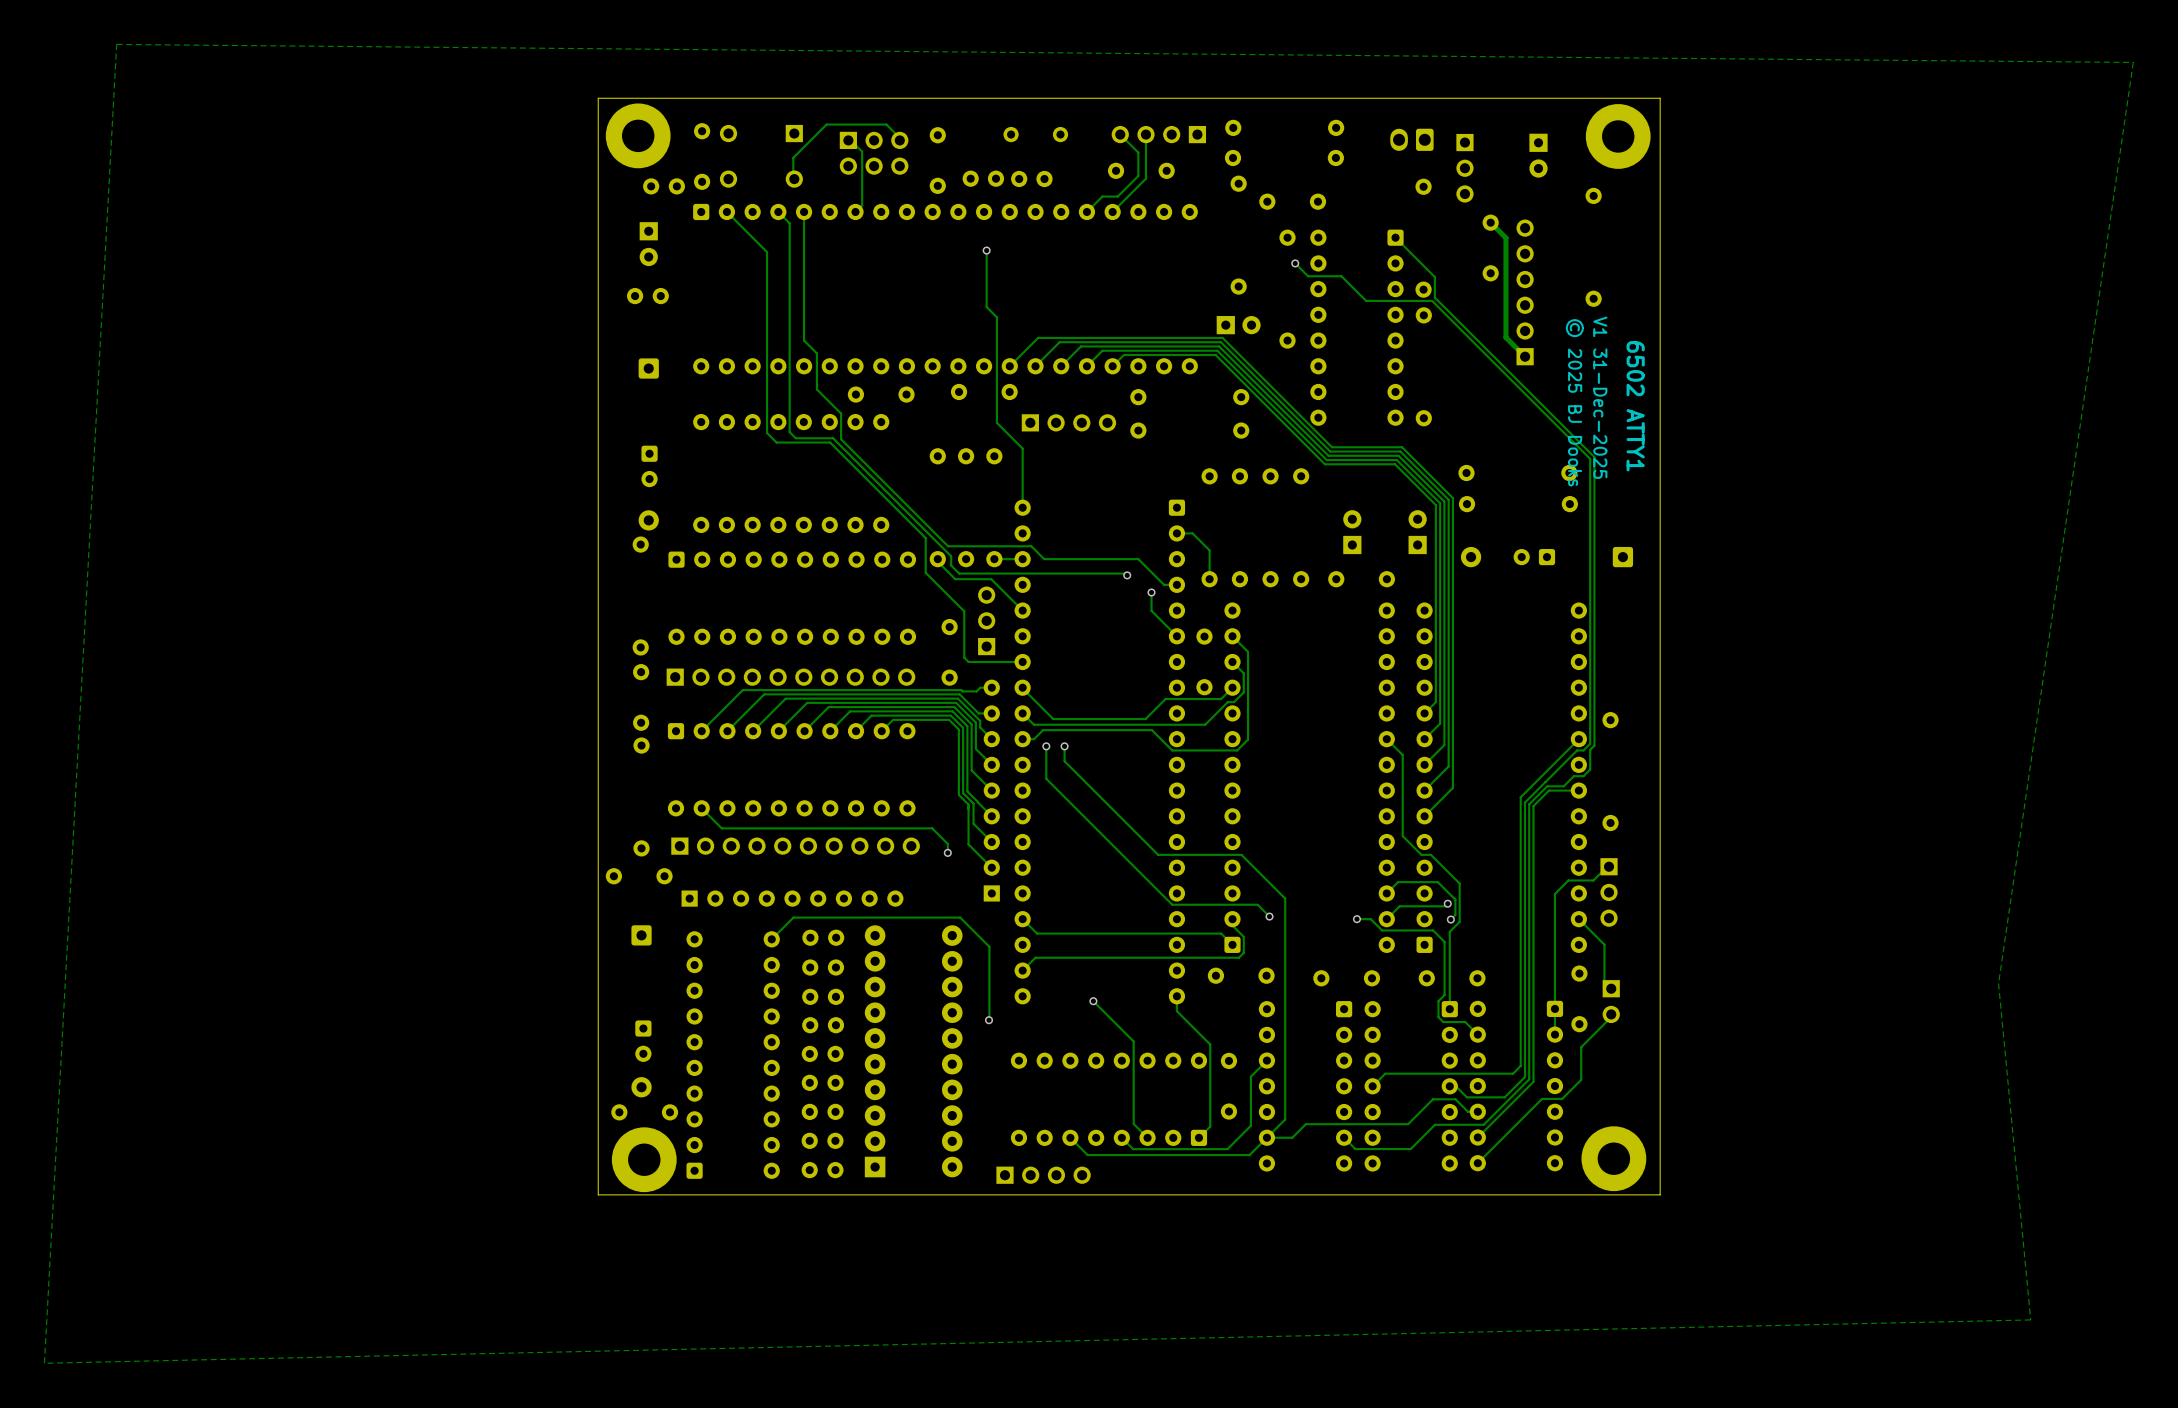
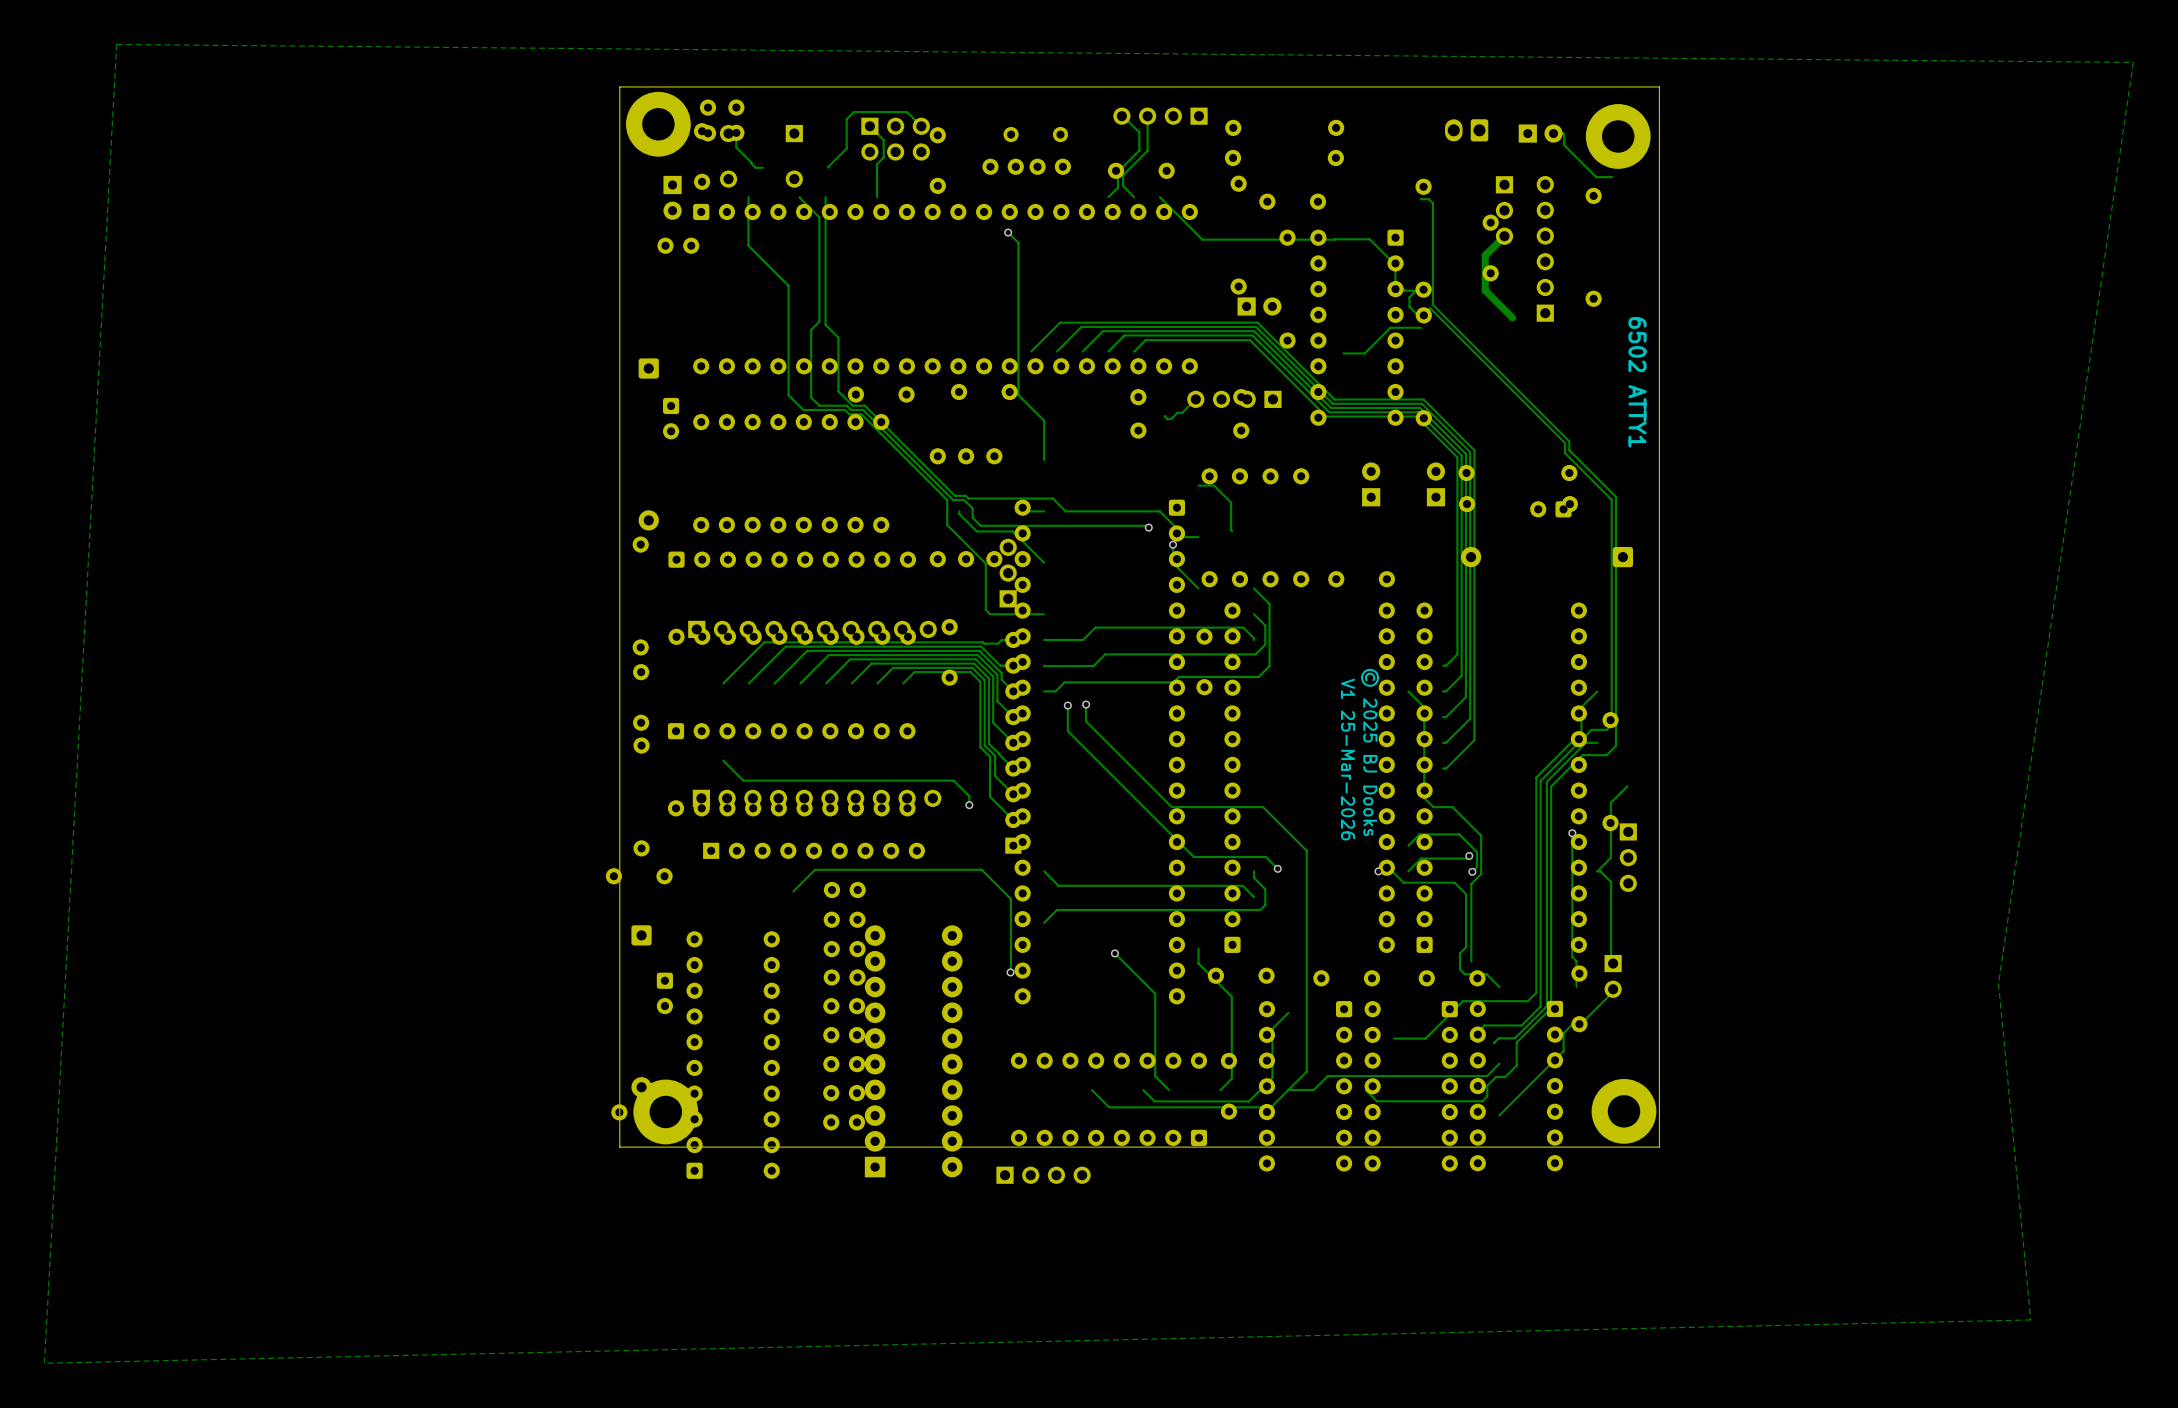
board edge: (1660, 98) (598, 98) (598, 1194) (1660, 1194) (1660, 98) -> (1659, 86) (1659, 1147) (619, 1147) (619, 86) (1659, 86)
track: none -> (1121, 116) (1139, 132) (1139, 150) (1118, 171) (1118, 187) (1108, 197)
track: none -> (1147, 116) (1147, 150) (1123, 175) (1123, 186) (1134, 197)
part: none -> (708, 120)
part: none -> (736, 120)
track: none -> (869, 126) (883, 140) (883, 157) (877, 164) (877, 197)
track: none -> (921, 126) (907, 112) (853, 112) (846, 119) (846, 148) (828, 167)
track: none -> (736, 132) (736, 147) (755, 167) (762, 167)
track: none -> (1553, 133) (1564, 134) (1564, 145) (1596, 177) (1612, 177)
track: (1120, 134) (1138, 152) (1138, 175) (1117, 196) (1102, 196) (1086, 211) -> none
track: (1145, 134) (1145, 178) (1112, 211) -> none
part position: (1158, 134) -> (1160, 116)
part position: (638, 135) -> (658, 124)
part position: (1411, 139) -> (1466, 130)
track: (848, 140) (850, 140) (862, 151) (862, 205) (855, 211) -> none
track: (899, 140) (899, 137) (886, 124) (826, 124) (793, 157) (794, 179) -> none
part position: (874, 153) -> (895, 139)
part rotation: 0° (1538, 155) -> 90° counterclockwise (1540, 133)
part: none -> (1003, 166)
part: none -> (1050, 166)
part position: (1464, 168) -> (1504, 210)
part: (983, 178) -> none
part: (1031, 179) -> none
part: (664, 186) -> none
track: none -> (748, 197) (748, 245) (788, 285) (788, 395) (803, 409) (845, 409) (849, 414) (861, 414) (947, 500) (947, 525) (985, 563) (985, 609) (990, 614) (1044, 614)
track: none -> (799, 197) (819, 217) (819, 321) (811, 329) (811, 397) (819, 405) (846, 405) (851, 409) (863, 409) (953, 500) (964, 500) (966, 502) (972, 508) (972, 517) (980, 525) (1146, 525) (1148, 527) (1146, 527)
track: none -> (825, 197) (825, 324) (838, 337) (838, 391) (852, 405) (864, 405) (955, 495) (965, 495) (968, 498) (1052, 498) (1065, 511) (1159, 511) (1185, 537) (1198, 537)
track: none -> (1159, 197) (1202, 239) (1369, 239) (1395, 264) (1395, 281) (1405, 290) (1416, 290) (1409, 297) (1409, 306) (1416, 313) (1425, 313) (1430, 308) (1565, 443) (1565, 453) (1611, 499) (1611, 724) (1606, 729) (1591, 729) (1540, 780) (1540, 1006) (1521, 1025) (1484, 1025) (1471, 1038)
track: none -> (1420, 199) (1428, 199) (1432, 203) (1432, 304) (1569, 441) (1569, 450) (1615, 496) (1615, 746) (1606, 755) (1582, 755) (1551, 786) (1551, 1008) (1516, 1042) (1516, 1065) (1505, 1077) (1496, 1077) (1487, 1085) (1487, 1096) (1482, 1101) (1376, 1101) (1365, 1089)
track: (726, 211) (767, 252) (767, 432) (776, 442) (830, 442) (925, 538) (925, 572) (964, 611) (964, 657) (968, 662) (1022, 662) -> none
track: (778, 211) (789, 223) (789, 432) (795, 438) (833, 438) (951, 556) (951, 565) (959, 573) (1125, 573) (1127, 575) (1124, 575) -> none
track: (804, 211) (804, 340) (816, 353) (816, 389) (841, 413) (841, 439) (948, 546) (1031, 546) (1044, 559) (1138, 559) (1164, 584) (1176, 584) -> none
track: (1490, 222) (1505, 237) (1505, 337) (1525, 356) -> none
track: none -> (1008, 232) (1018, 242) (1018, 395) (1044, 420) (1044, 459)
track: none -> (1504, 236) (1485, 255) (1485, 290) (1512, 317)
track: (1395, 237) (1434, 277) (1434, 297) (1594, 457) (1594, 745) (1590, 749) (1590, 769) (1583, 776) (1573, 776) (1563, 786) (1547, 786) (1529, 804) (1529, 1079) (1483, 1124) (1434, 1124) (1410, 1149) (1355, 1149) (1344, 1137) -> none
part position: (648, 244) -> (672, 197)
part: none -> (678, 245)
track: (986, 250) (986, 307) (996, 317) (996, 422) (1022, 448) (1022, 507) -> none
via position: (986, 250) -> (1008, 232)
track: (1295, 263) (1308, 276) (1341, 276) (1366, 300) (1432, 300) (1590, 458) (1590, 743) (1583, 750) (1577, 750) (1524, 802) (1524, 1077) (1504, 1097) (1466, 1097) (1455, 1086) (1449, 1086) -> none
via: (1295, 263) -> none
part position: (1525, 292) -> (1545, 248)
part: (647, 296) -> none
part position: (1238, 325) -> (1259, 306)
track: none -> (1420, 327) (1390, 327) (1364, 353) (1343, 353)
track: none -> (1031, 351) (1060, 322) (1257, 322) (1334, 399) (1423, 399) (1474, 450) (1474, 740) (1446, 768) (1443, 768)
track: none -> (1057, 351) (1081, 326) (1256, 326) (1332, 403) (1421, 403) (1470, 452) (1470, 718) (1446, 742) (1443, 742)
track: none -> (1082, 351) (1103, 331) (1254, 331) (1331, 408) (1420, 408) (1465, 453) (1465, 697) (1446, 717) (1443, 717)
track: none -> (1108, 351) (1124, 335) (1252, 335) (1329, 412) (1418, 412) (1461, 455) (1461, 675) (1446, 691) (1443, 691)
track: none -> (1134, 351) (1145, 340) (1249, 340) (1326, 416) (1416, 416) (1457, 457) (1457, 654) (1446, 665) (1443, 665)
track: (1009, 366) (1038, 337) (1222, 337) (1331, 447) (1402, 447) (1452, 498) (1452, 787) (1424, 816) -> none
track: (1035, 366) (1059, 342) (1220, 342) (1330, 451) (1400, 451) (1448, 499) (1448, 766) (1424, 790) -> none
track: (1061, 366) (1081, 346) (1219, 346) (1328, 455) (1398, 455) (1444, 501) (1444, 745) (1424, 764) -> none
track: (1086, 366) (1102, 350) (1217, 350) (1326, 460) (1396, 460) (1440, 503) (1440, 723) (1424, 739) -> none
track: (1112, 366) (1123, 354) (1215, 355) (1324, 464) (1395, 464) (1435, 505) (1435, 702) (1424, 713) -> none
text: V1 31-Dec-2025 (1600, 397) -> none
track: none -> (1195, 399) (1182, 412) (1177, 412) (1171, 418) (1167, 418) (1165, 415)
part: none -> (1234, 399)
text: © 2025 BJ Dooks (1574, 402) -> none
text position: 6502 ATTY1 (1635, 406) -> 6502 ATTY1 (1637, 382)
part: (1068, 422) -> none
part position: (649, 466) -> (671, 418)
part: none -> (1371, 484)
part: none -> (1435, 484)
via: none -> (1148, 527)
part: (1352, 532) -> none
part: (1417, 532) -> none
track: (1176, 533) (1192, 533) (1209, 550) (1210, 578) -> (1198, 485) (1214, 485) (1231, 502) (1232, 531)
via: none -> (1173, 544)
part position: (1534, 557) -> (1550, 509)
track: (937, 559) (937, 561) (955, 579) (991, 579) (1022, 610) -> (959, 511) (959, 513) (976, 531) (1012, 531) (1044, 562)
track: (1022, 559) (994, 559) -> (1044, 511) (1015, 511)
via: (1127, 575) -> none
track: none -> (1254, 588) (1269, 604) (1269, 666) (1258, 676) (1178, 676) (1173, 682) (1064, 682) (1055, 691) (1044, 691)
track: (1151, 592) (1151, 610) (1176, 636) -> (1173, 544) (1173, 563) (1198, 588)
via: (1151, 592) -> none
track: none -> (1254, 614) (1265, 625) (1265, 644) (1255, 654) (1105, 654) (1093, 666) (1044, 665)
part position: (986, 620) -> (1008, 573)
track: (1232, 636) (1248, 651) (1248, 739) (1237, 750) (1172, 750) (1151, 730) (1043, 730) (1034, 739) (1022, 739) -> none
track: none -> (1254, 639) (1243, 627) (1095, 627) (1083, 639) (1044, 639)
track: (1232, 662) (1243, 673) (1243, 692) (1234, 702) (1227, 702) (1205, 724) (1033, 724) (1022, 713) -> none
part position: (790, 677) -> (812, 629)
track: (991, 687) (980, 687) (976, 691) (742, 690) (701, 731) -> (1013, 639) (1001, 639) (998, 643) (764, 642) (723, 683)
track: (1232, 687) (1221, 699) (1165, 699) (1145, 719) (1053, 719) (1022, 687) -> none
track: none -> (1408, 691) (1424, 707) (1424, 797) (1433, 807) (1452, 807) (1481, 835) (1481, 874) (1471, 884) (1471, 961)
track: none -> (1597, 691) (1581, 707) (1581, 732) (1536, 777) (1536, 992) (1527, 1001) (1463, 1001) (1425, 1038) (1394, 1038)
track: none -> (1086, 704) (1086, 721) (1171, 807) (1263, 807) (1306, 850) (1306, 1071) (1271, 1107) (1109, 1107) (1091, 1090)
via: none -> (1086, 704)
track: none -> (1067, 705) (1067, 731) (1193, 856) (1265, 856) (1277, 868)
via: none -> (1067, 705)
track: (991, 713) (978, 713) (959, 694) (764, 694) (727, 731) -> (1013, 665) (1000, 665) (981, 646) (785, 646) (748, 683)
track: (753, 731) (785, 698) (957, 698) (980, 720) (980, 727) (991, 739) -> (774, 683) (807, 650) (979, 650) (1001, 673) (1001, 679) (1013, 691)
track: (778, 731) (807, 702) (956, 702) (975, 722) (975, 748) (991, 764) -> (800, 683) (828, 655) (977, 655) (997, 674) (997, 701) (1013, 717)
track: (804, 731) (828, 707) (954, 707) (971, 724) (971, 770) (991, 790) -> (826, 683) (850, 659) (975, 659) (993, 676) (993, 722) (1013, 742)
track: (830, 731) (850, 711) (952, 711) (967, 726) (967, 791) (991, 816) -> (851, 683) (871, 663) (974, 663) (988, 678) (988, 743) (1013, 768)
track: (856, 731) (871, 715) (950, 715) (963, 727) (963, 793) (973, 803) (973, 823) (991, 842) -> (877, 683) (893, 667) (972, 667) (984, 680) (984, 745) (995, 755) (995, 775) (1013, 794)
track: (881, 731) (893, 719) (949, 719) (958, 729) (958, 794) (968, 804) (968, 844) (991, 867) -> (903, 683) (914, 672) (970, 672) (980, 681) (980, 747) (990, 756) (990, 796) (1013, 819)
track: (1386, 739) (1402, 755) (1402, 836) (1421, 854) (1431, 854) (1459, 883) (1459, 921) (1449, 931) (1449, 1009) -> none
track: (1578, 739) (1520, 797) (1520, 1065) (1512, 1073) (1385, 1073) (1372, 1086) -> none
track: none -> (1597, 742) (1585, 742) (1546, 781) (1546, 1006) (1514, 1038) (1498, 1038) (1494, 1043)
track: (1046, 746) (1046, 778) (1172, 904) (1257, 904) (1269, 916) -> none
via: (1046, 746) -> none
track: (1064, 746) (1064, 761) (1158, 854) (1241, 854) (1285, 898) (1285, 1119) (1249, 1155) (1087, 1155) (1070, 1137) -> none
via: (1064, 746) -> none
text: none -> © 2025 BJ Dooks (1370, 752)
text: none -> V1 25-Mar-2026 (1348, 759)
track: none -> (1627, 786) (1610, 802) (1610, 857) (1597, 871) (1600, 871) (1611, 882) (1611, 961) (1613, 963)
part position: (991, 790) -> (1013, 742)
track: (1578, 790) (1548, 790) (1533, 806) (1533, 1081) (1477, 1137) -> none
via: none -> (969, 805)
track: (701, 808) (721, 828) (932, 828) (947, 843) (947, 852) -> (723, 760) (743, 780) (953, 780) (969, 796) (969, 805)
track: none -> (1572, 833) (1572, 956) (1576, 961) (1576, 986)
via: none -> (1572, 833)
part position: (795, 846) -> (817, 798)
via: (947, 852) -> none
via: none -> (1469, 855)
track: (1609, 866) (1593, 880) (1568, 880) (1554, 893) (1554, 1034) -> none
via: none -> (1277, 868)
via: none -> (1378, 871)
via: none -> (1472, 871)
part: none -> (844, 889)
part position: (1609, 892) -> (1628, 857)
track: (1386, 893) (1398, 882) (1437, 882) (1455, 899) (1455, 915) (1450, 919) -> (1408, 845) (1419, 834) (1459, 834) (1476, 851) (1476, 867) (1472, 871)
part position: (792, 898) -> (814, 850)
track: (1447, 903) (1445, 906) (1399, 906) (1386, 919) -> (1469, 855) (1466, 858) (1421, 858) (1408, 871)
via: (1447, 903) -> none
via: (1269, 916) -> none
part: none -> (844, 919)
track: (1022, 919) (1037, 933) (1221, 933) (1232, 944) -> (1044, 871) (1058, 885) (1242, 885) (1254, 897)
track: (1232, 919) (1232, 925) (1243, 936) (1243, 952) (1238, 957) (1035, 957) (1022, 970) -> (1254, 871) (1254, 877) (1265, 889) (1265, 905) (1260, 909) (1057, 909) (1044, 922)
track: (1356, 919) (1370, 919) (1382, 930) (1433, 930) (1444, 941) (1444, 995) (1438, 1001) (1438, 1017) (1443, 1022) (1465, 1022) (1477, 1034) -> (1378, 871) (1392, 871) (1403, 882) (1454, 882) (1466, 894) (1466, 947) (1460, 953) (1460, 969) (1464, 974) (1486, 974) (1499, 986)
via: (1356, 919) -> none
via: (1450, 919) -> none
track: (1578, 919) (1604, 944) (1604, 981) (1611, 988) -> none
part: (823, 937) -> none
track: (771, 939) (793, 917) (960, 917) (989, 946) (989, 1020) -> (793, 891) (815, 869) (981, 869) (1010, 899) (1010, 972)
part: none -> (844, 949)
via: none -> (1114, 953)
part: (823, 967) -> none
via: none -> (1010, 972)
part: none -> (844, 977)
track: none -> (1613, 989) (1613, 991) (1581, 1023) (1572, 1023) (1563, 1033) (1563, 1051) (1499, 1115)
part: (823, 996) -> none
track: (1176, 996) (1176, 1011) (1210, 1044) (1210, 1126) (1198, 1137) -> (1198, 948) (1198, 963) (1231, 996) (1231, 1078) (1220, 1090)
track: (1093, 1001) (1133, 1041) (1133, 1123) (1147, 1137) -> (1114, 953) (1155, 993) (1155, 1076) (1169, 1090)
via: (1093, 1001) -> none
part position: (1611, 1001) -> (1613, 976)
part: none -> (844, 1006)
track: (1611, 1014) (1611, 1017) (1581, 1047) (1581, 1079) (1562, 1098) (1542, 1098) (1477, 1163) -> none
via: (989, 1020) -> none
part: (823, 1025) -> none
part: none -> (844, 1035)
part position: (643, 1041) -> (664, 993)
part: (822, 1053) -> none
track: (1266, 1060) (1250, 1076) (1250, 1125) (1227, 1149) (1133, 1149) (1121, 1137) -> (1288, 1012) (1272, 1028) (1272, 1077) (1248, 1101) (1154, 1101) (1143, 1090)
track: none -> (1499, 1063) (1487, 1076) (1327, 1076) (1313, 1089) (1288, 1089)
part: none -> (844, 1064)
part: (822, 1082) -> none
part: none -> (844, 1093)
part: (822, 1111) -> none
track: (1477, 1111) (1468, 1111) (1455, 1099) (1433, 1099) (1408, 1124) (1305, 1124) (1292, 1137) (1266, 1137) -> none
part: none -> (844, 1122)
part: (822, 1140) -> none
part position: (1613, 1158) -> (1624, 1111)
part position: (644, 1159) -> (665, 1111)
part: (822, 1170) -> none

